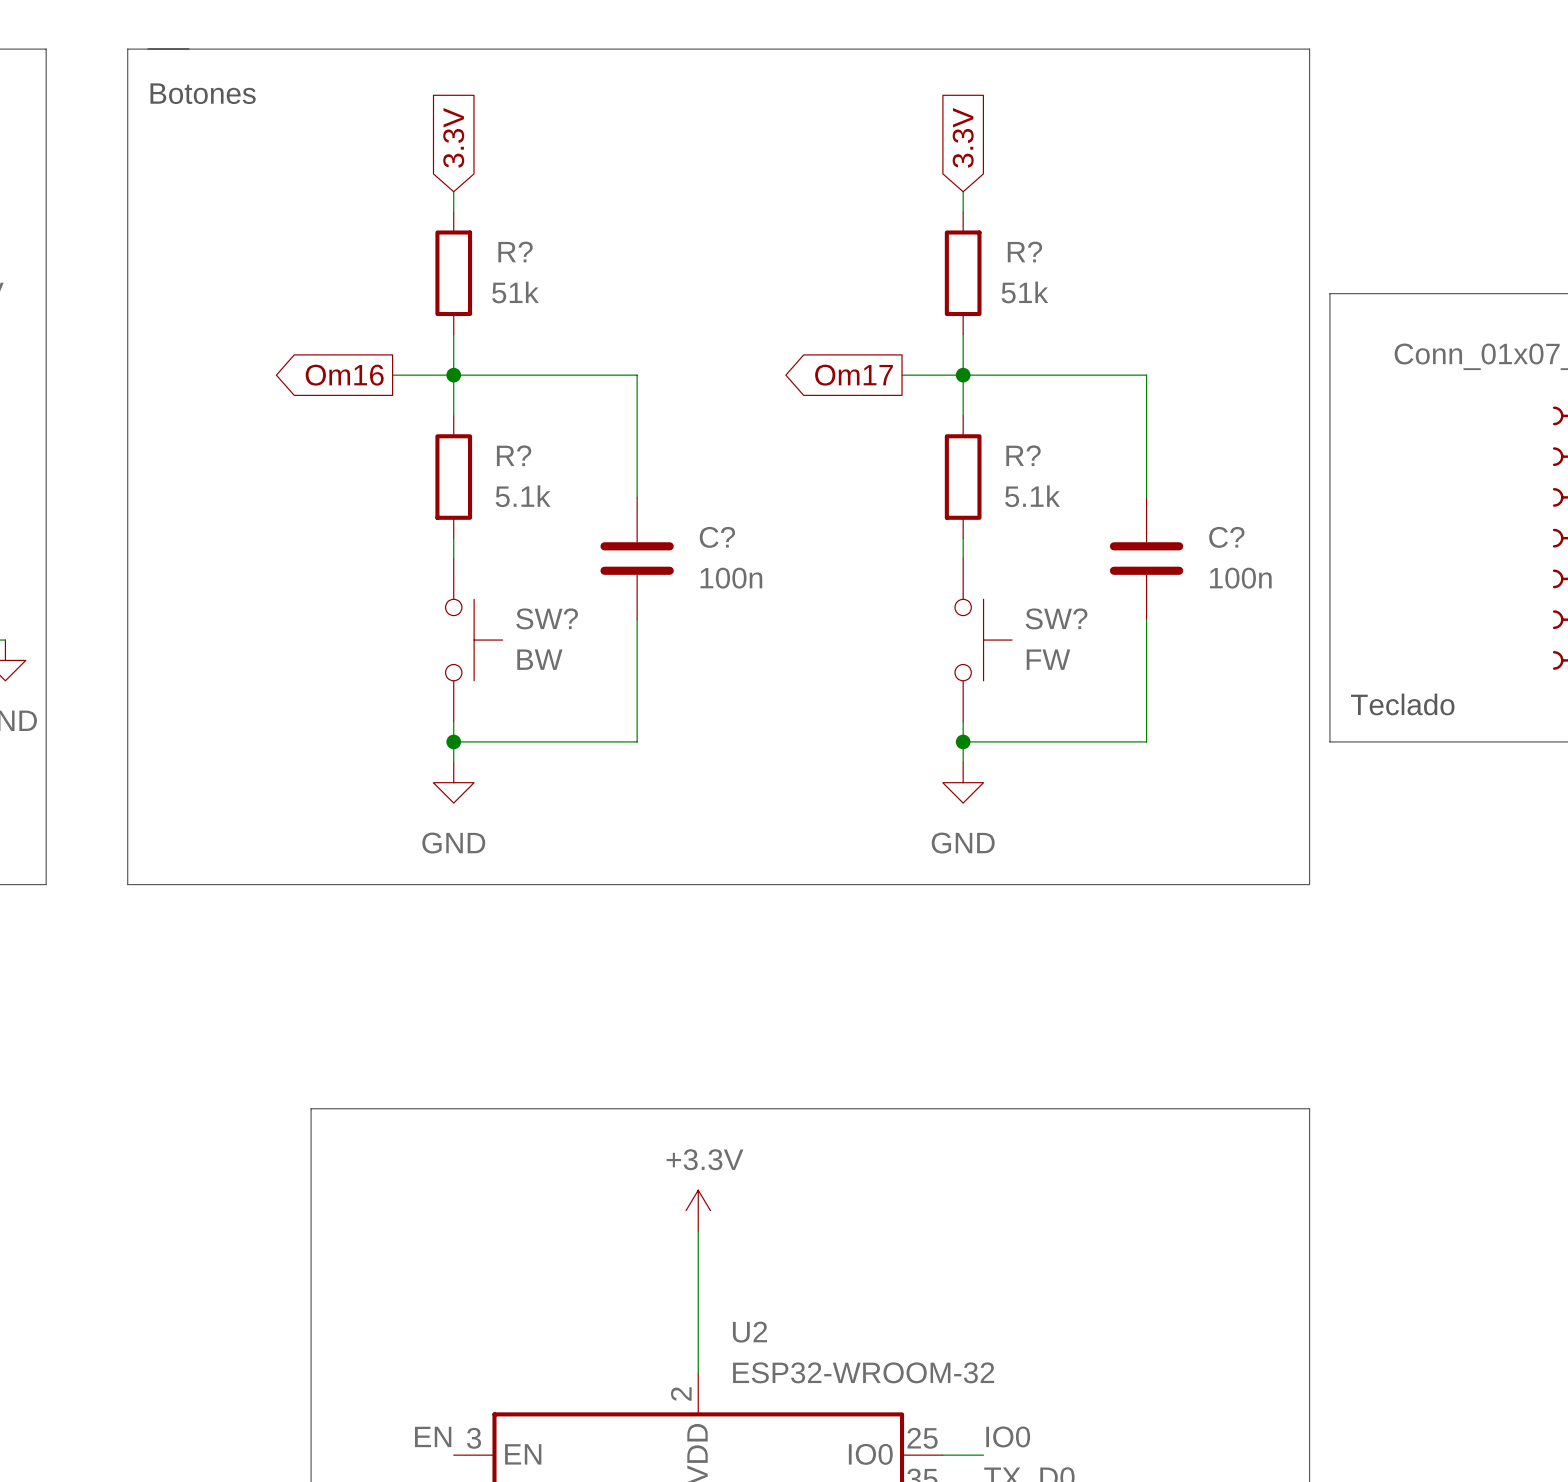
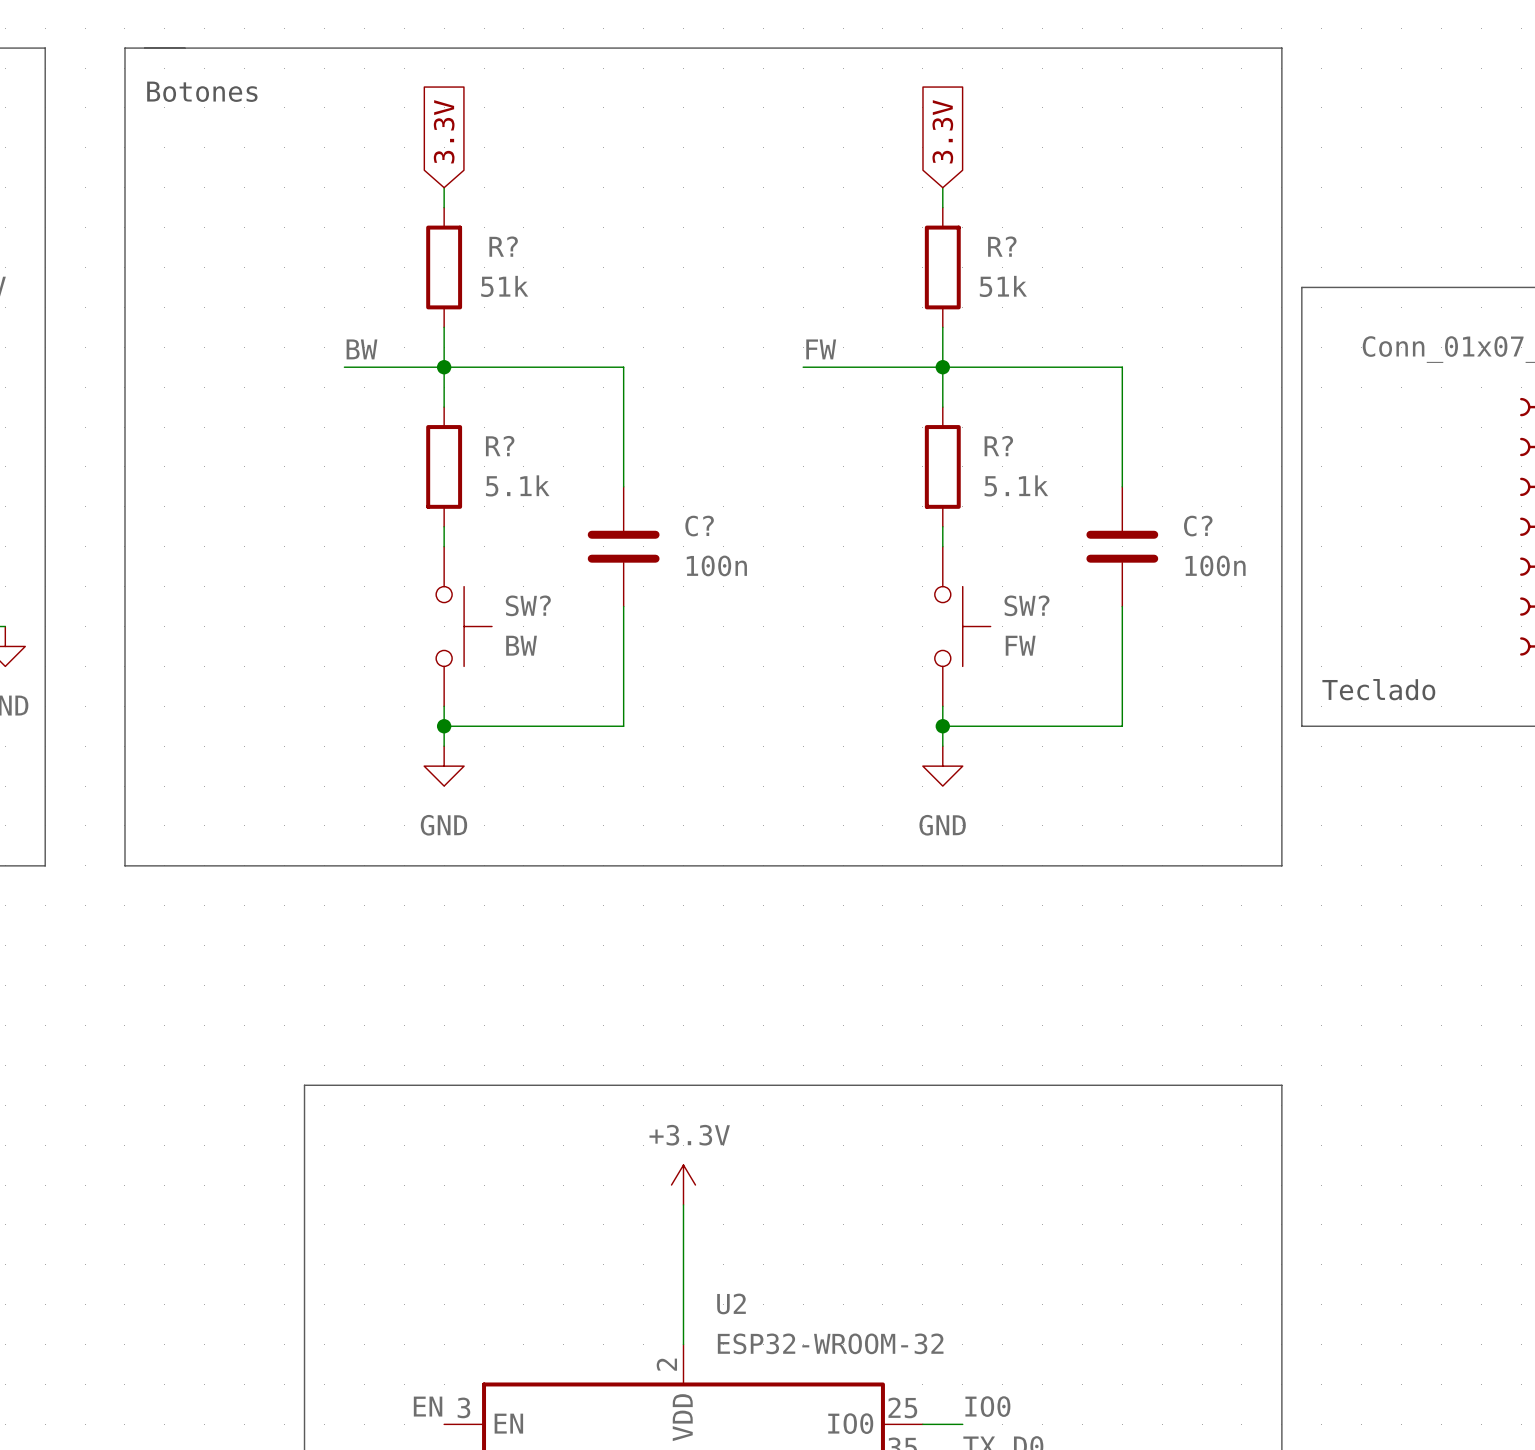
label: none -> BW (361, 349)
label: none -> FW (821, 349)
global label: Om16 (344, 375) -> none
wire: none -> (344, 367) (384, 367)
wire: none -> (803, 367) (882, 367)
global label: Om17 (854, 375) -> none

